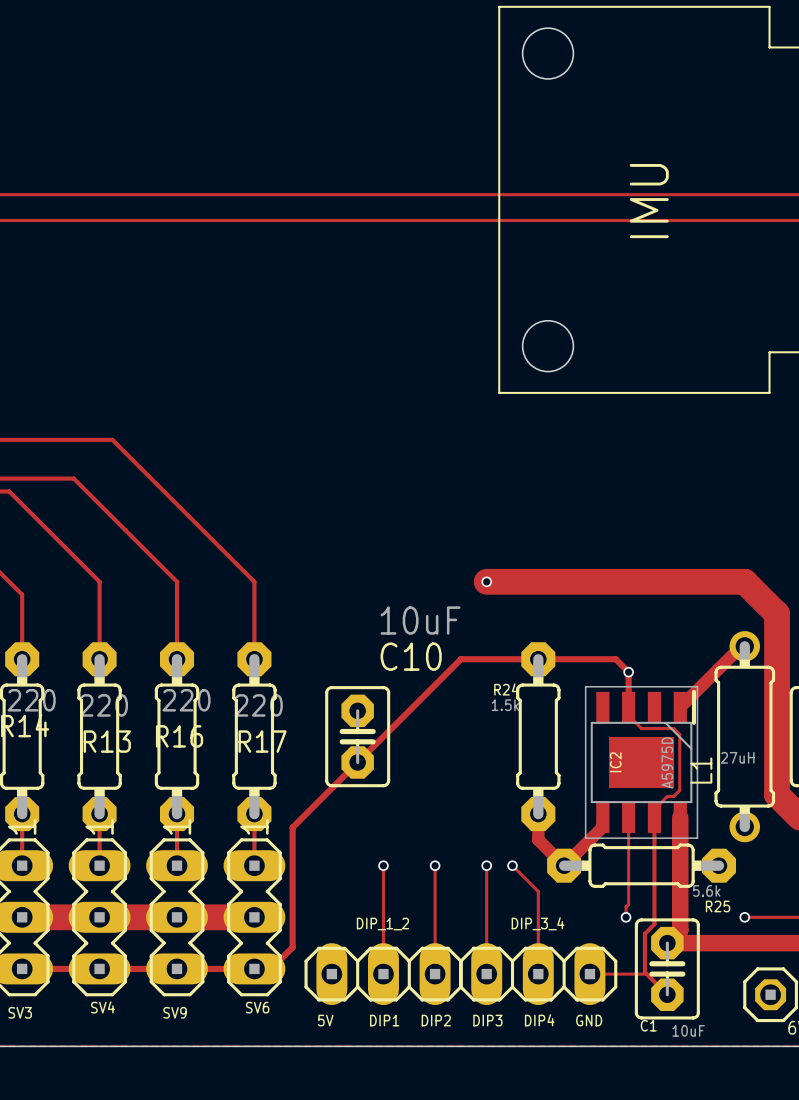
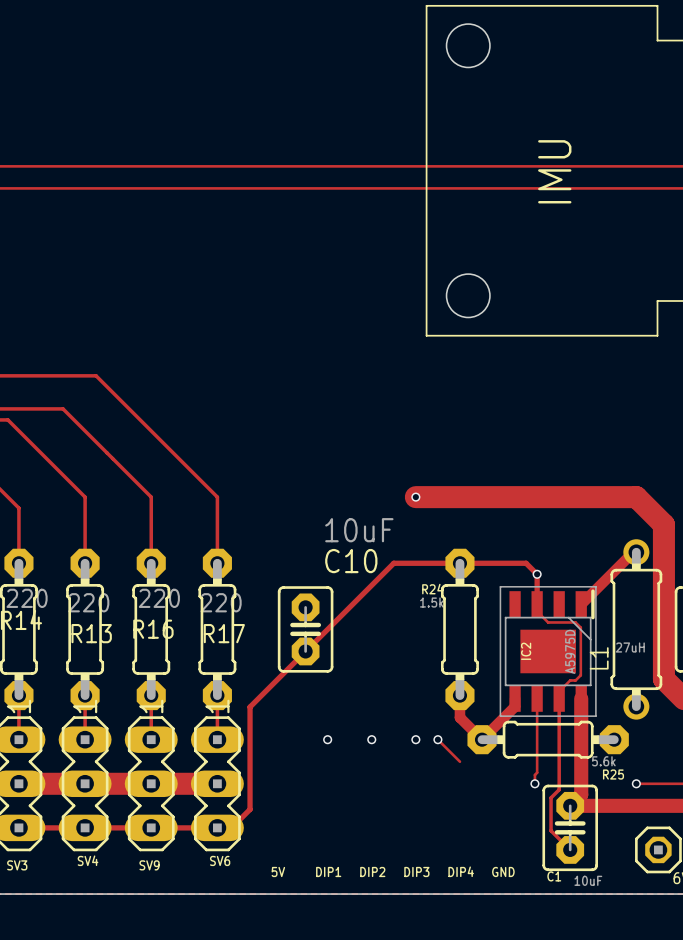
track: (383, 865) (383, 974) -> none
track: (435, 865) (435, 974) -> none
track: (486, 865) (486, 974) -> none
track: (538, 891) (538, 974) -> none
DIP_1_2: (383, 974) -> none
DIP_3_4: (538, 974) -> none
track: (589, 974) (646, 974) -> none

